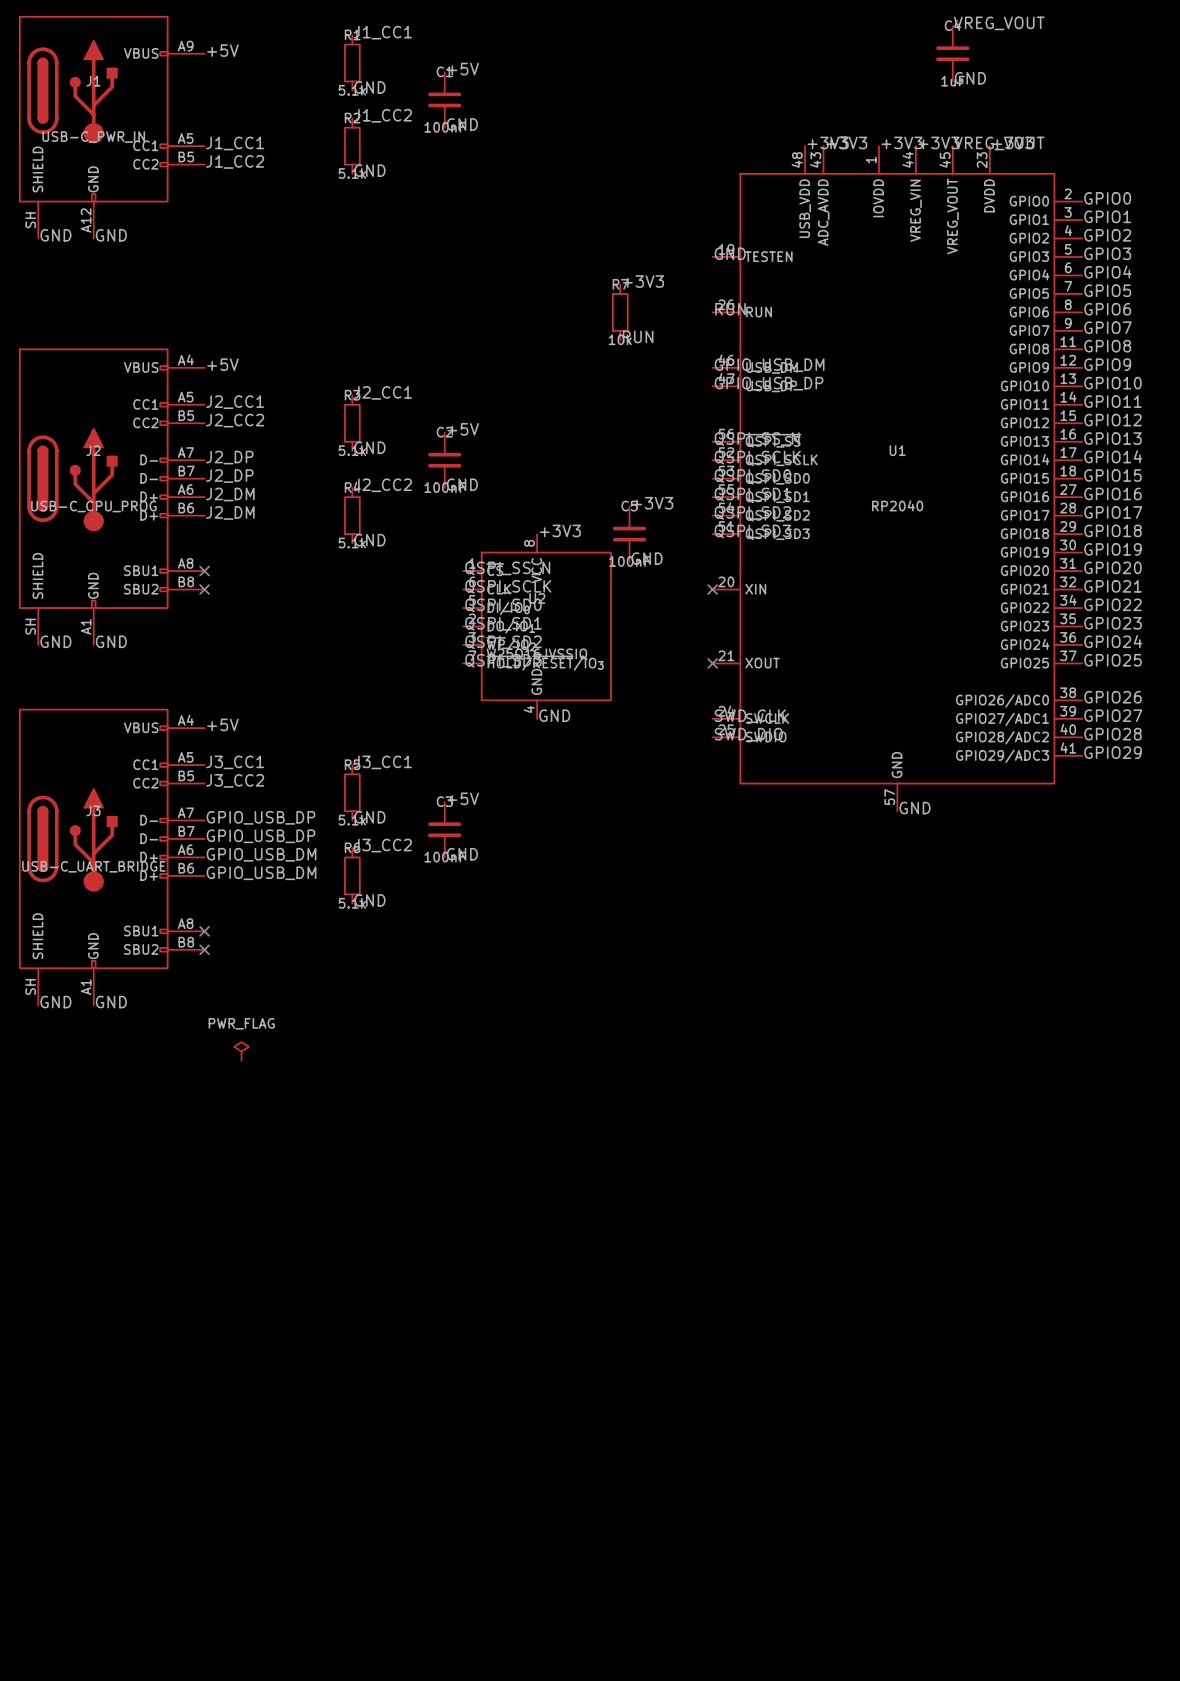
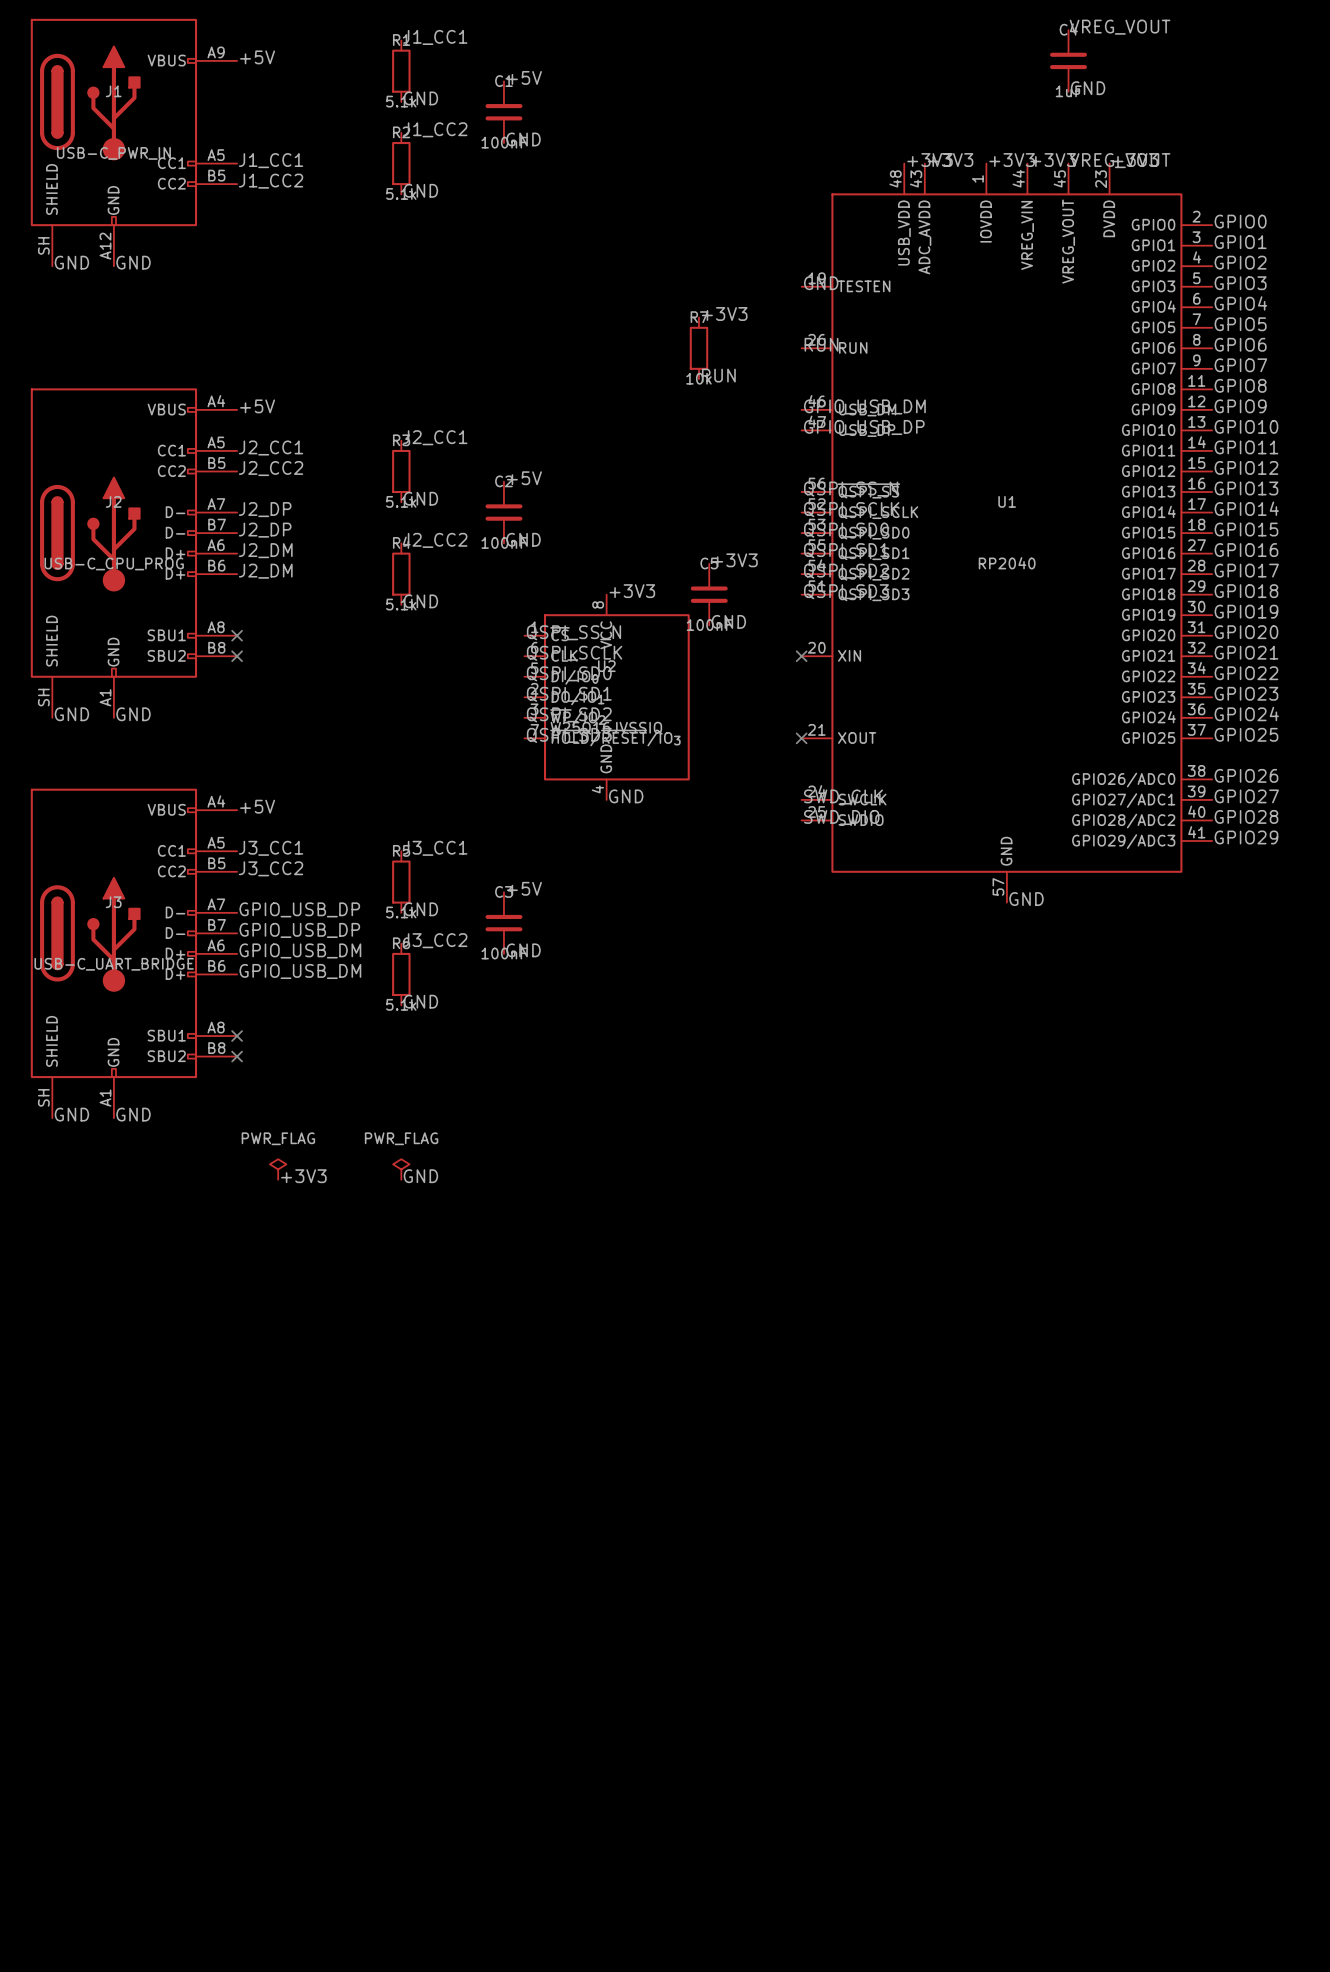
power symbol: none -> PWR_FLAG (401, 1169)
label: none -> +3V3 (303, 1176)
label: none -> GND (420, 1176)

